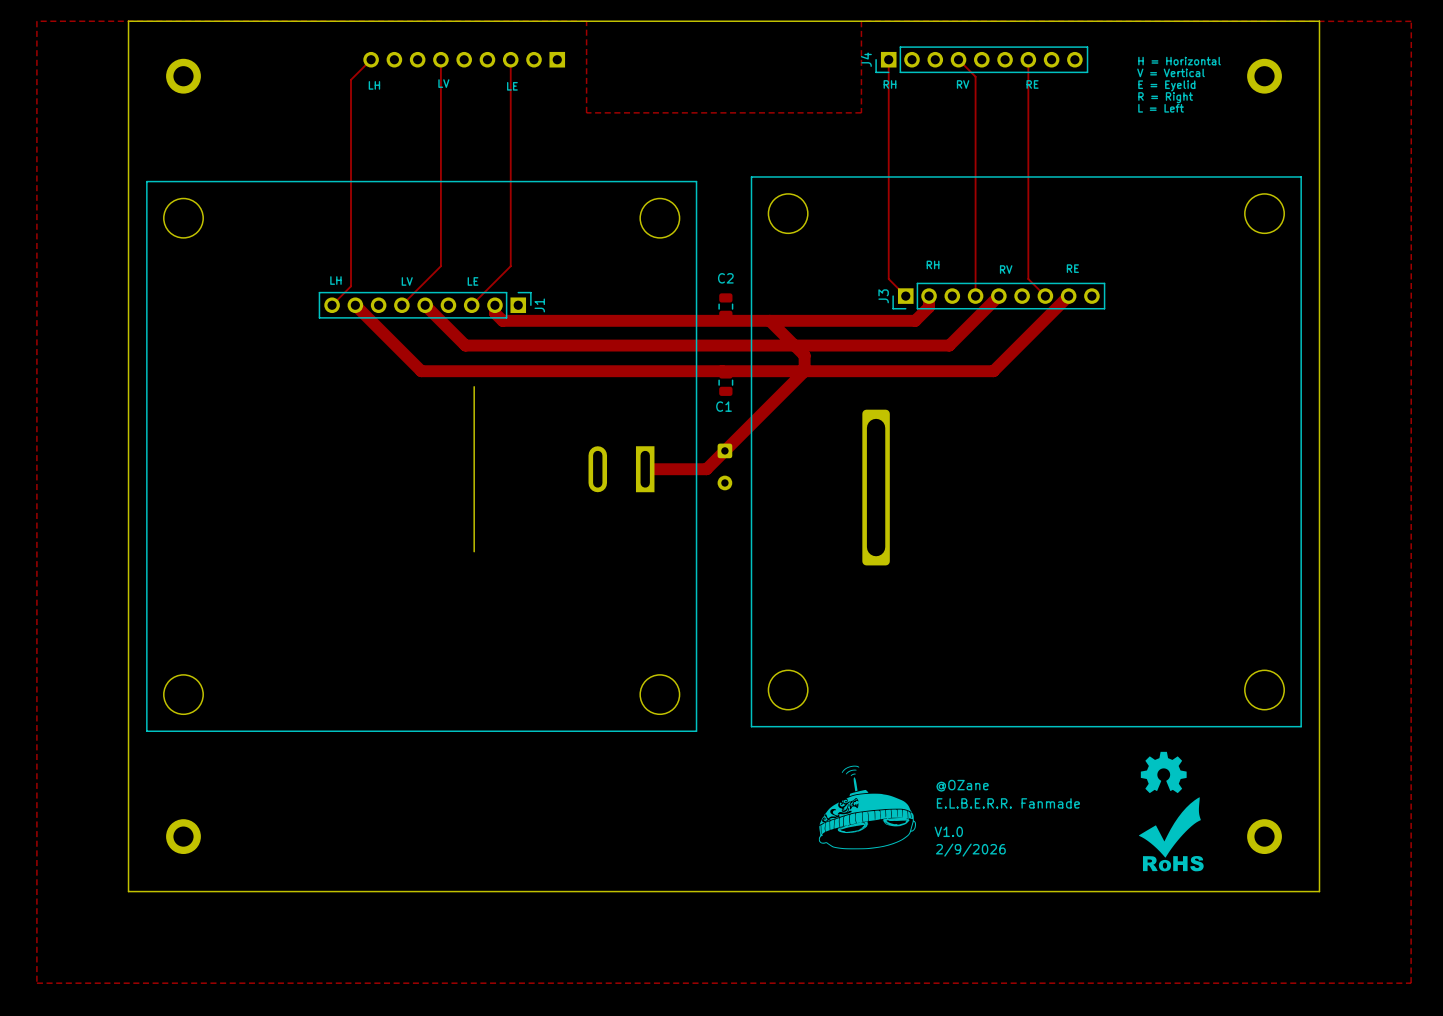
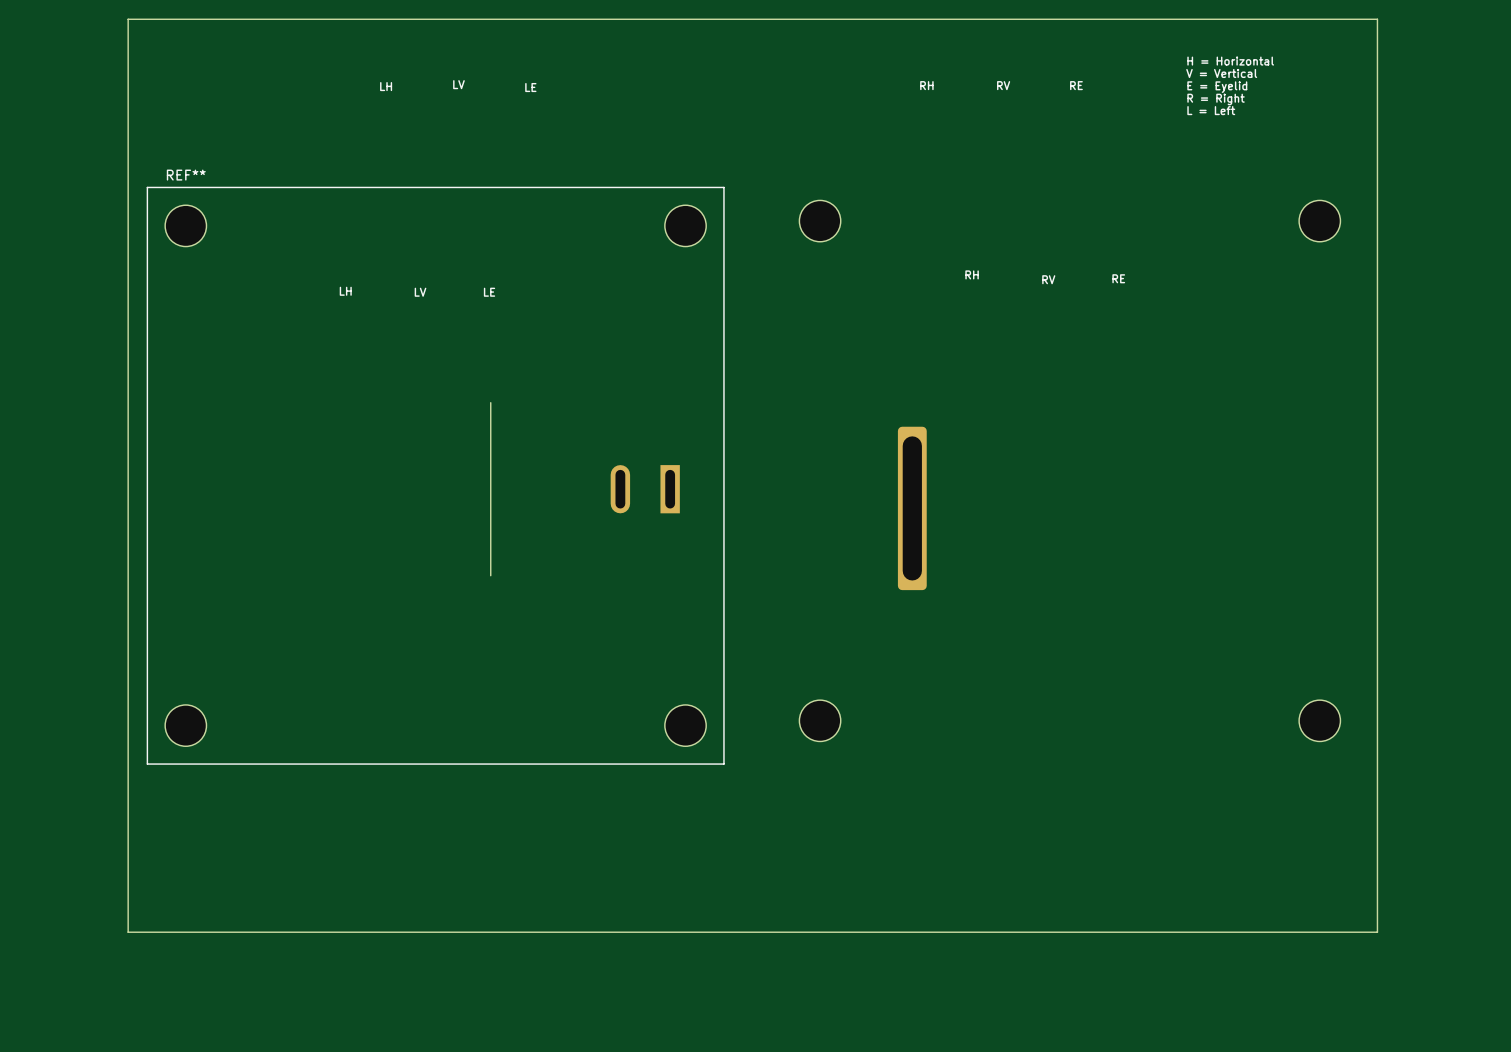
zone outline: (36, 21) (586, 21) (586, 112) (861, 112) (861, 21) (1411, 21) (1411, 983) (36, 983) (36, 21) -> none
track: (371, 59) (350, 79) (350, 286) (332, 305) -> none
track: (440, 59) (440, 266) (401, 305) -> none
part: (464, 59) -> none
track: (510, 59) (510, 266) (471, 305) -> none
track: (888, 59) (888, 279) (905, 296) -> none
track: (958, 59) (975, 76) (975, 296) -> none
J4: (981, 59) -> none
track: (1028, 59) (1028, 279) (1045, 296) -> none
part: (183, 76) -> none
part: (1264, 76) -> none
REF** name: none -> REF** (186, 175)
line: (751, 176) (1301, 176) (1301, 726) (751, 726) (751, 176) -> none
track: (929, 296) (929, 307) (915, 320) (502, 320) (494, 313) (494, 305) -> none
track: (998, 296) (949, 345) (465, 345) (425, 305) -> none
J3: (998, 296) -> none
track: (1068, 296) (993, 371) (421, 371) (355, 305) -> none
J1: (425, 305) -> none
C2: (725, 306) -> none
track: (769, 320) (804, 355) (804, 371) (706, 469) (645, 469) -> none
C1: (725, 382) -> none
part: (724, 466) -> none
drawing: [1138, 751, 1204, 872] -> none
drawing: [818, 765, 916, 850] -> none
text: @OZane (962, 785) -> none
text: E.L.B.E.R.R. Fanmade (1008, 803) -> none
text: V1.0 (948, 831) -> none
part: (183, 836) -> none
part: (1264, 836) -> none
text: 2/9/2026 (970, 850) -> none

